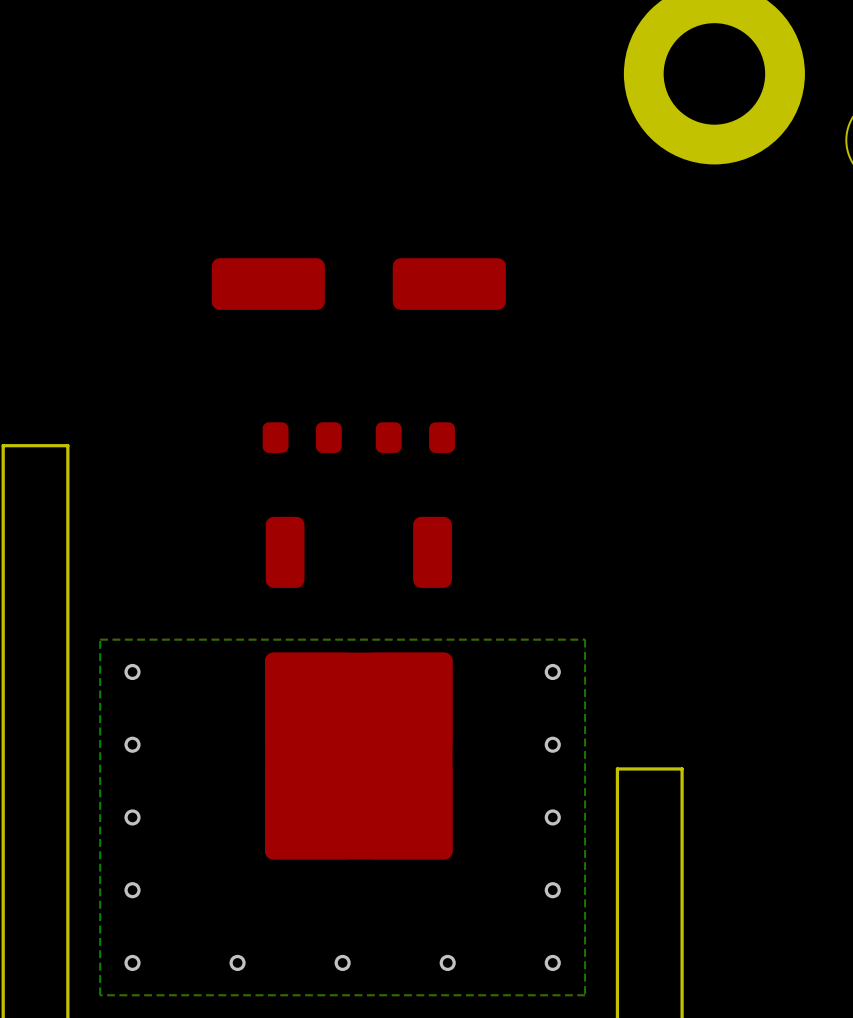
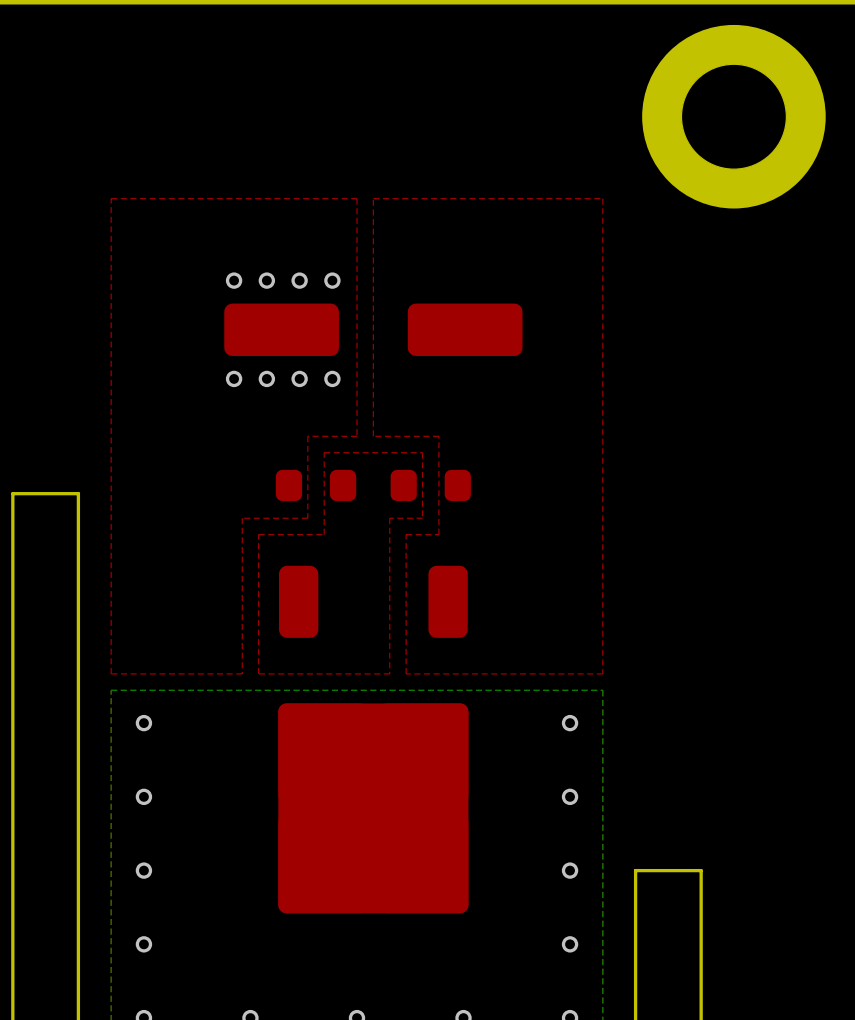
top zone outline: none -> (356, 198) (111, 198) (111, 673) (242, 673) (242, 518) (307, 518) (307, 436) (356, 436) (356, 198)
top zone outline: none -> (602, 198) (373, 198) (373, 436) (438, 436) (438, 534) (406, 534) (406, 673) (602, 673) (602, 198)
via: none -> (234, 280)
via: none -> (266, 280)
via: none -> (299, 280)
via: none -> (332, 280)
via: none -> (234, 378)
via: none -> (266, 378)
via: none -> (299, 378)
via: none -> (332, 378)
top zone outline: none -> (422, 452) (422, 518) (389, 518) (389, 673) (258, 673) (258, 534) (324, 534) (324, 452) (422, 452)
board edge: (682, 817) (682, 768) (617, 768) (617, 817) -> (701, 870) (635, 870)

